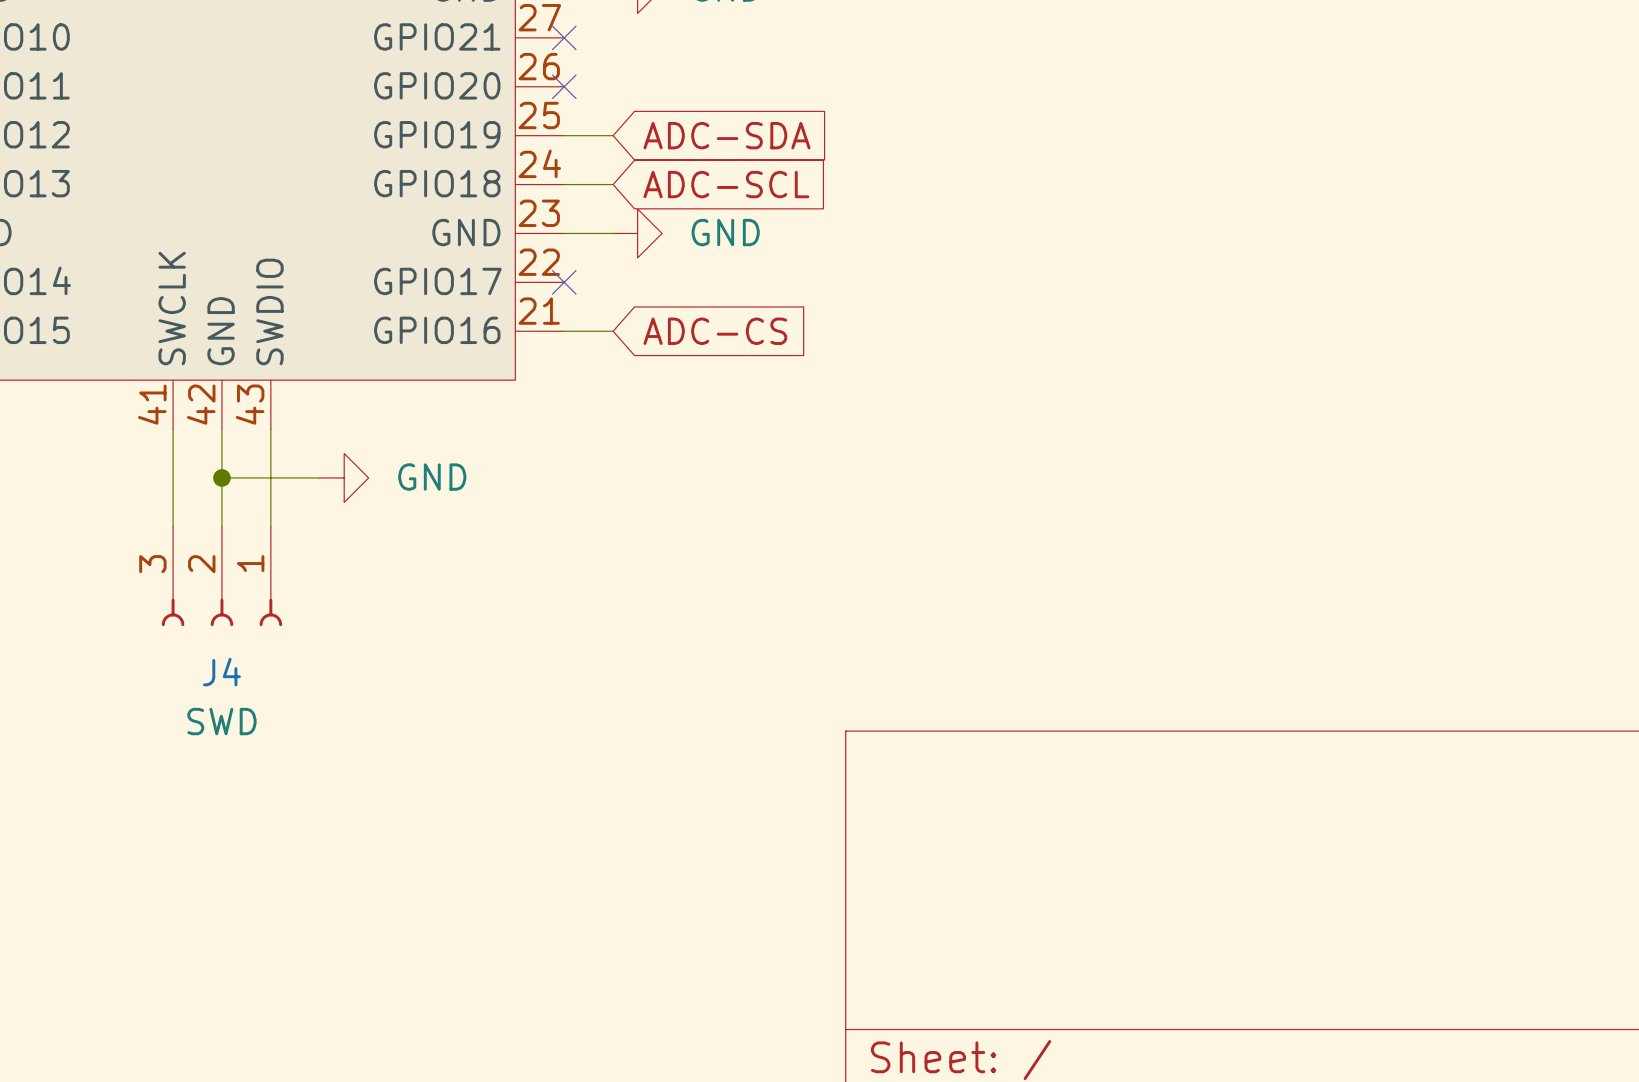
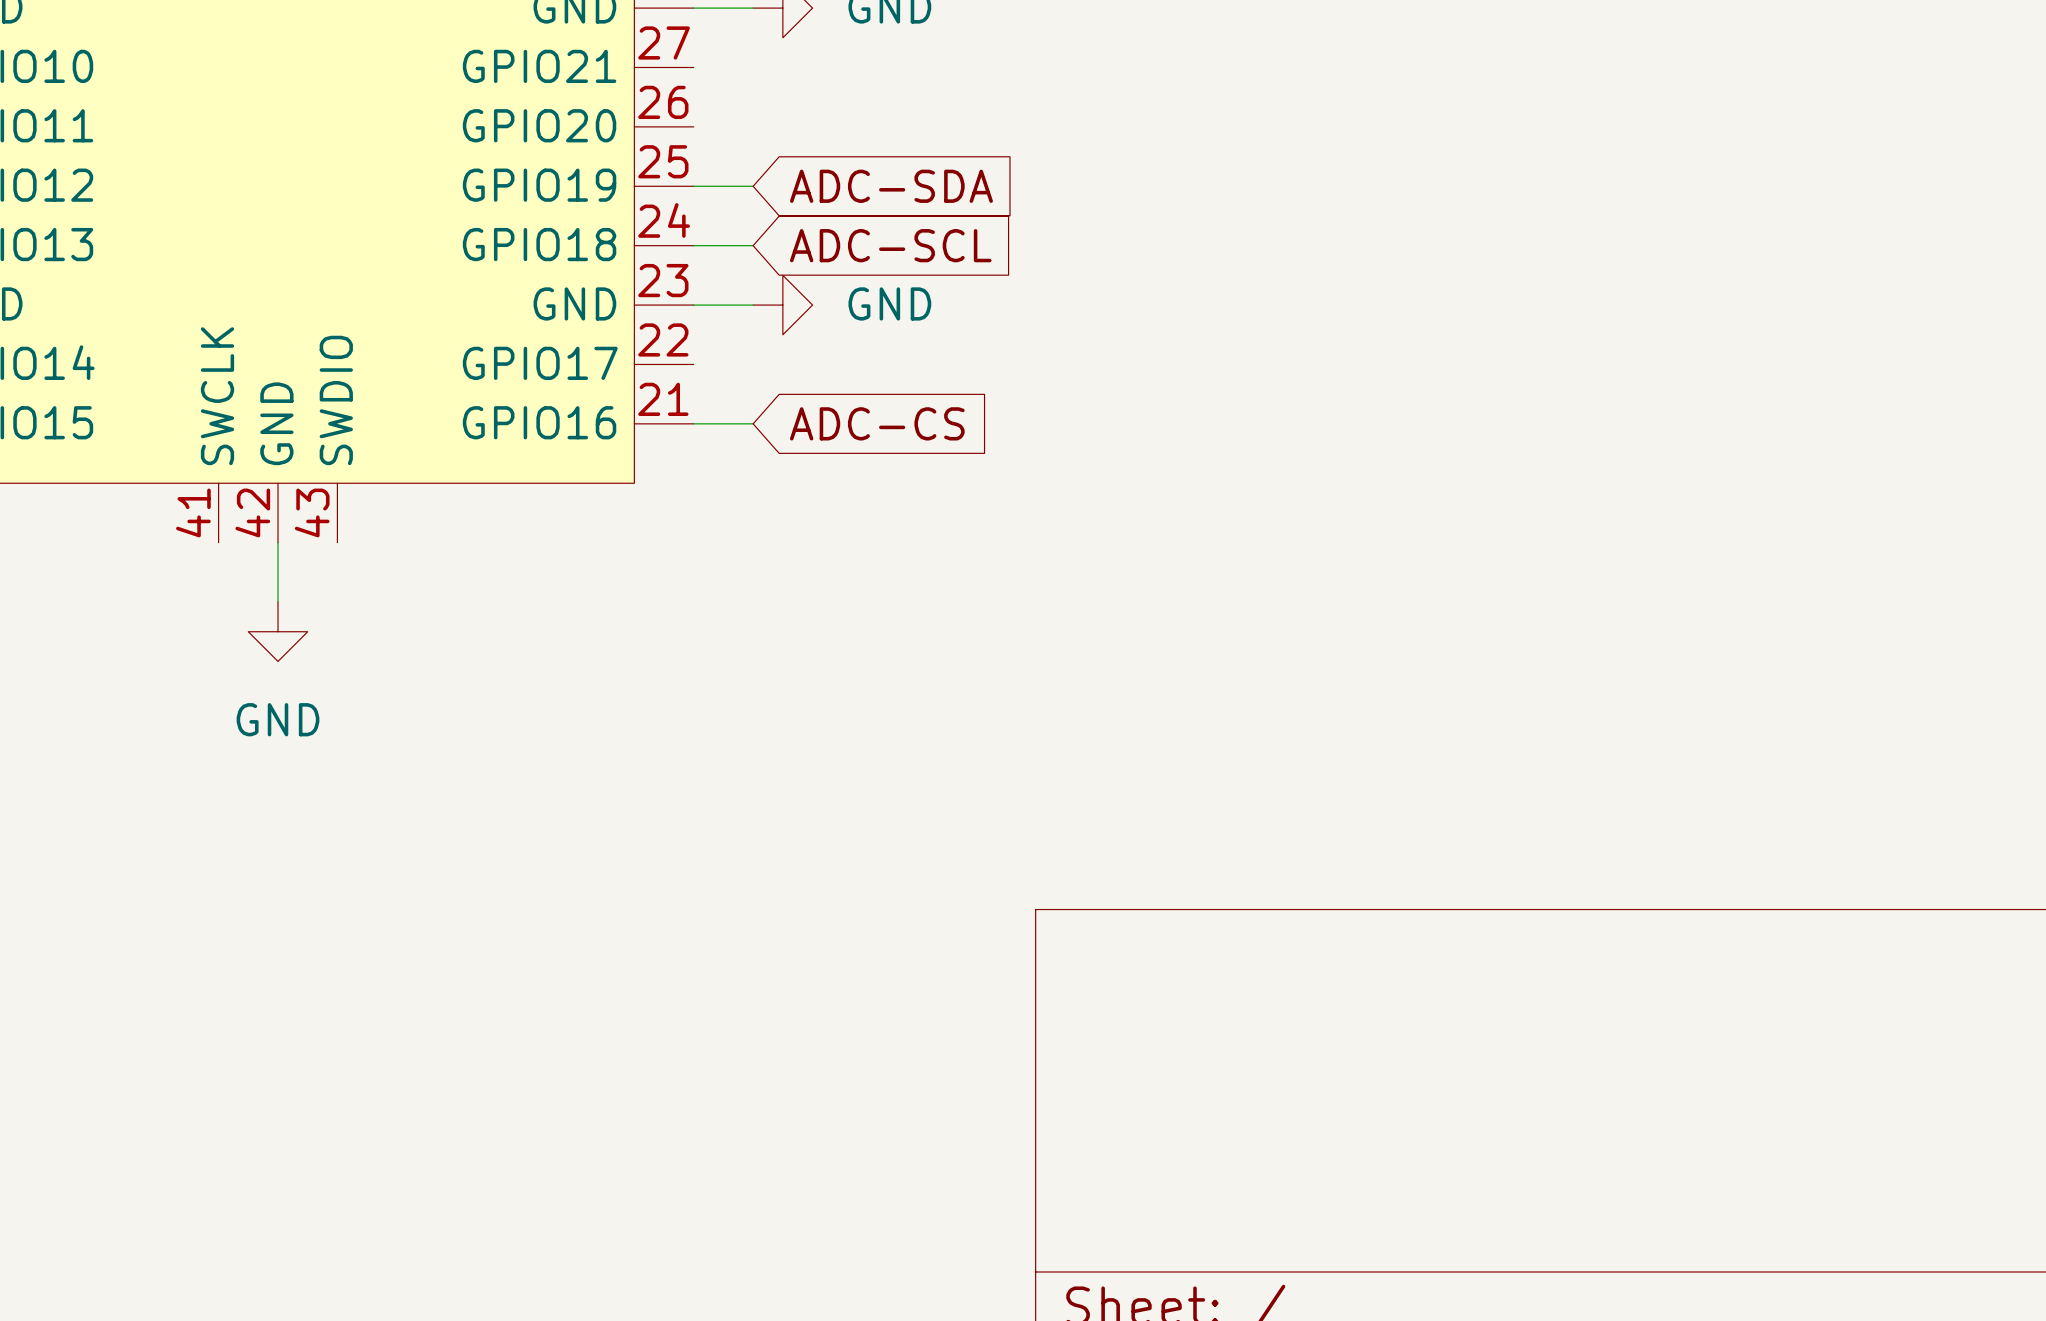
no-connect mark: (564, 37) -> none
no-connect mark: (564, 86) -> none
no-connect mark: (564, 282) -> none
wire: (173, 429) (173, 526) -> none
wire: (270, 429) (270, 526) -> none
junction: (221, 477) -> none
wire: (319, 477) (221, 477) (221, 526) -> none
power symbol rotation: 0° (344, 477) -> 90° clockwise (278, 631)
power symbol position: GND (344, 477) -> GND (278, 631)
J4: SWD (221, 576) -> none

